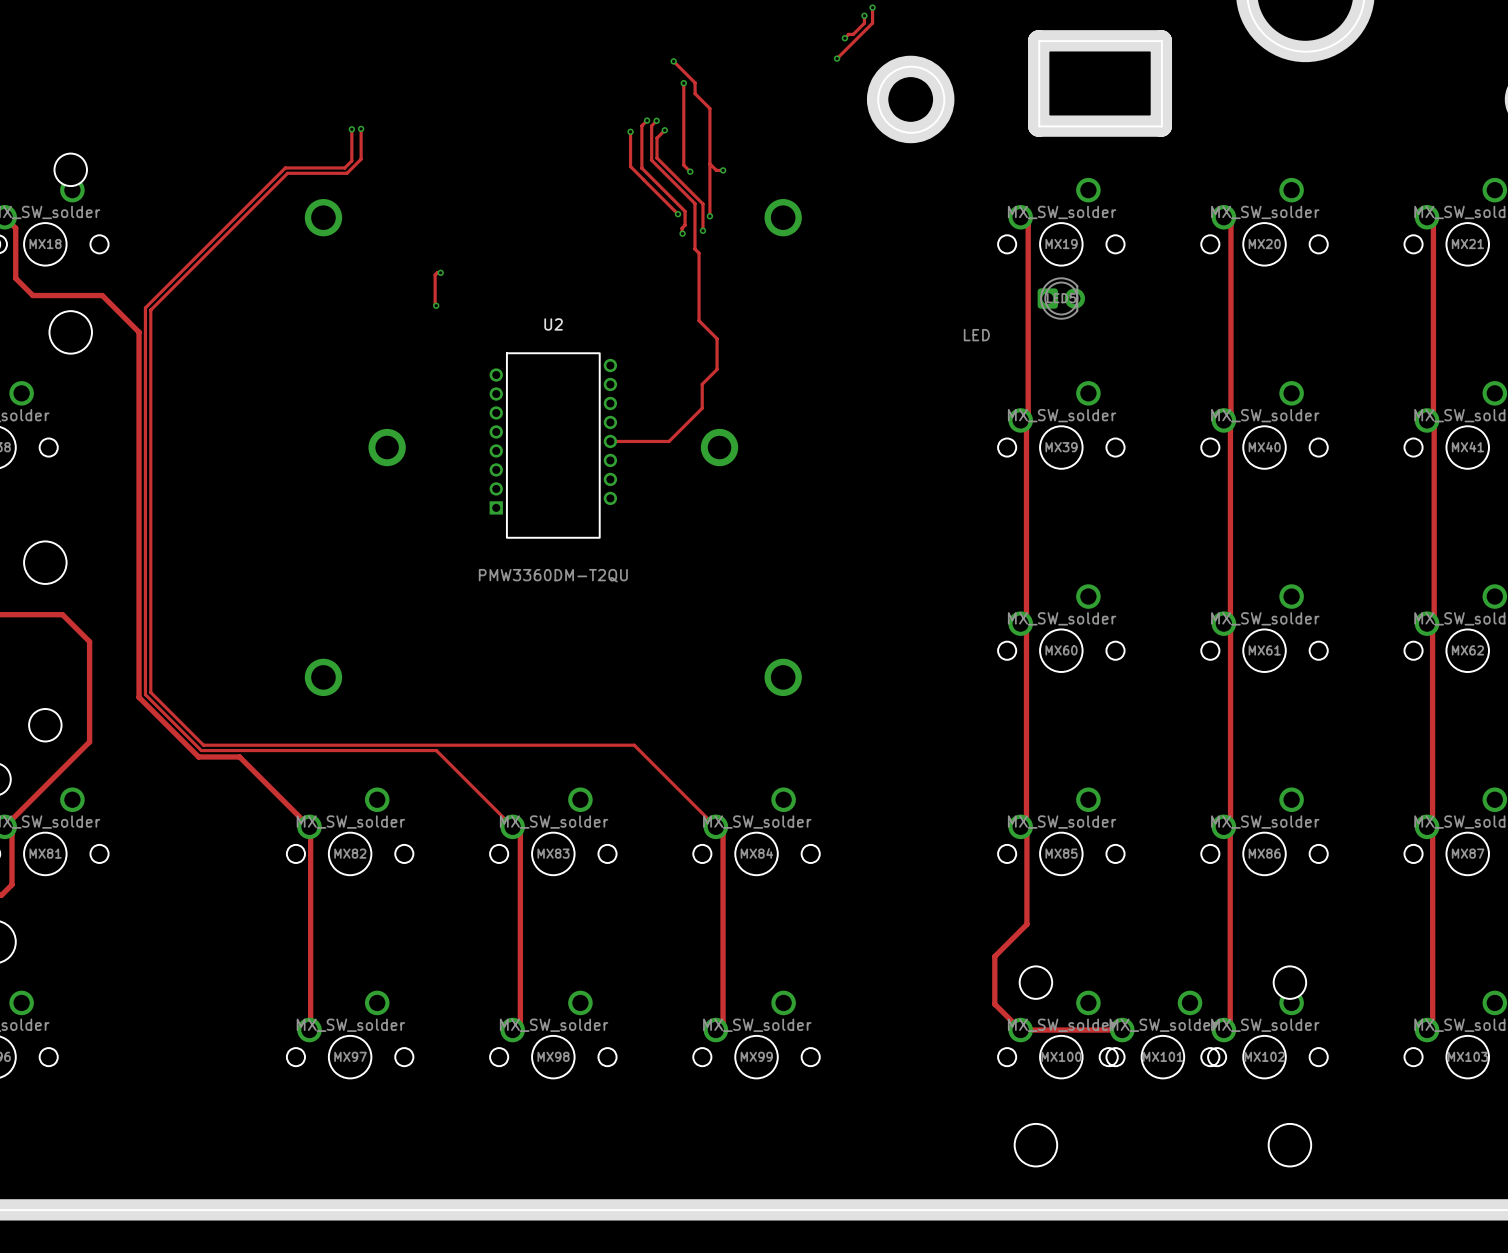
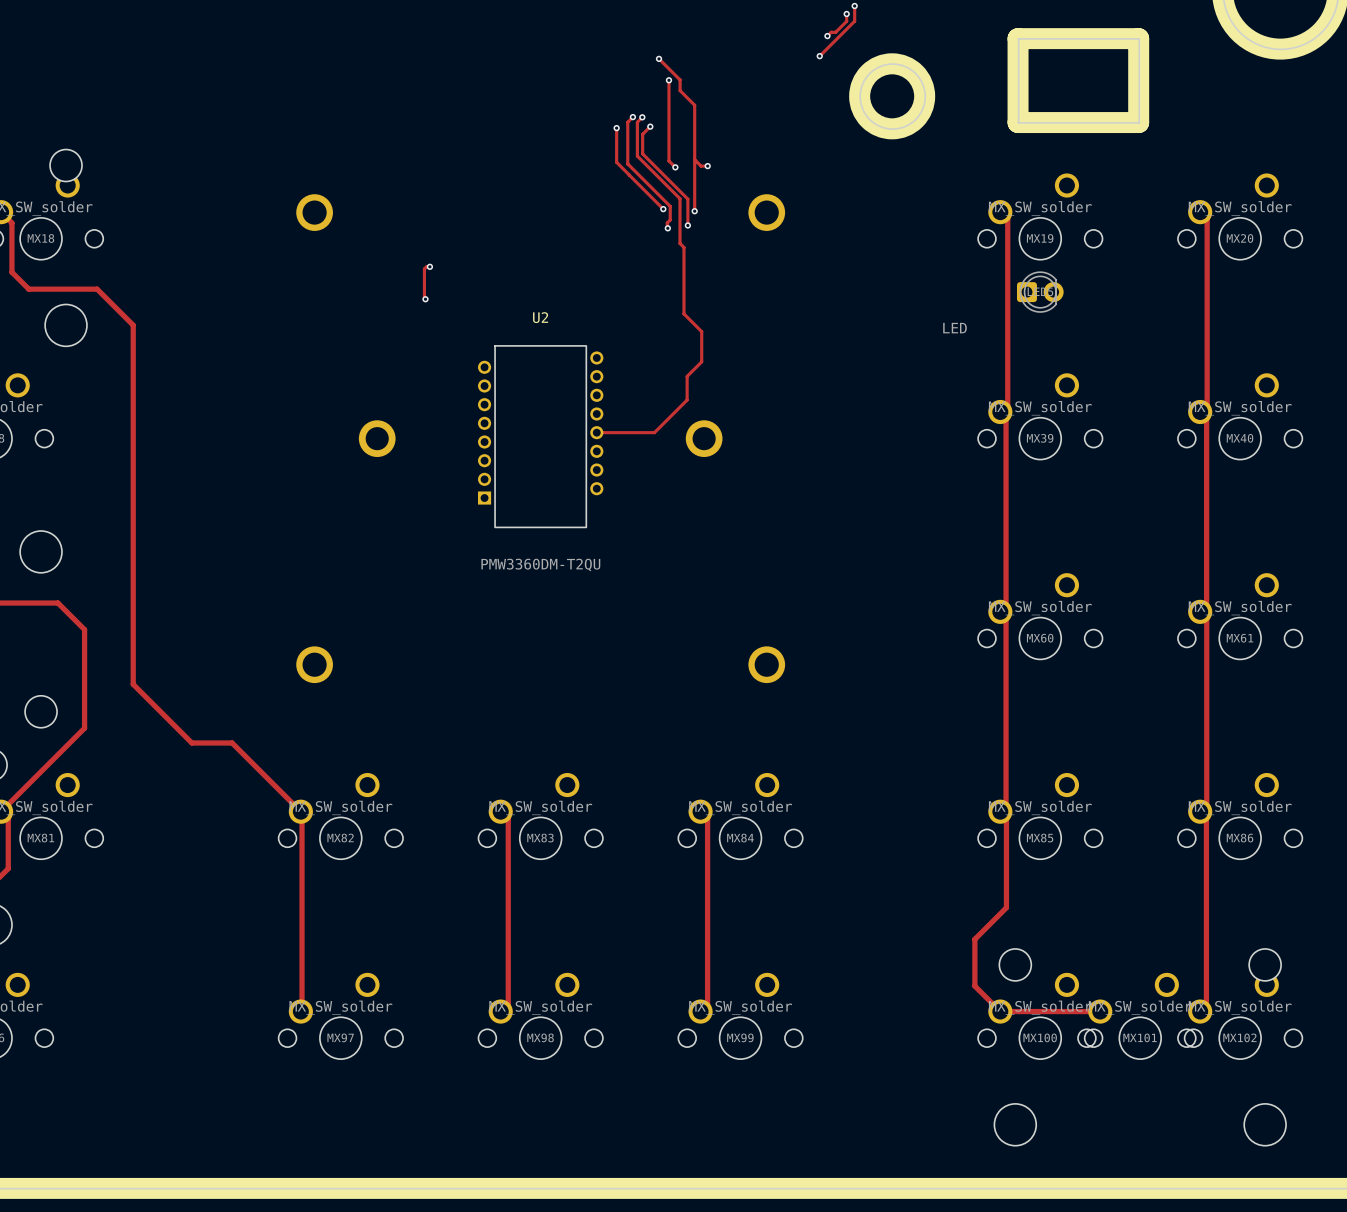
track: (361, 128) (361, 159) (347, 173) (287, 173) (150, 310) (150, 692) (203, 745) (634, 745) (715, 826) -> none
via: (361, 128) -> none
track: (351, 129) (351, 160) (344, 167) (285, 167) (145, 307) (145, 694) (201, 750) (436, 750) (512, 826) -> none
via: (351, 129) -> none

